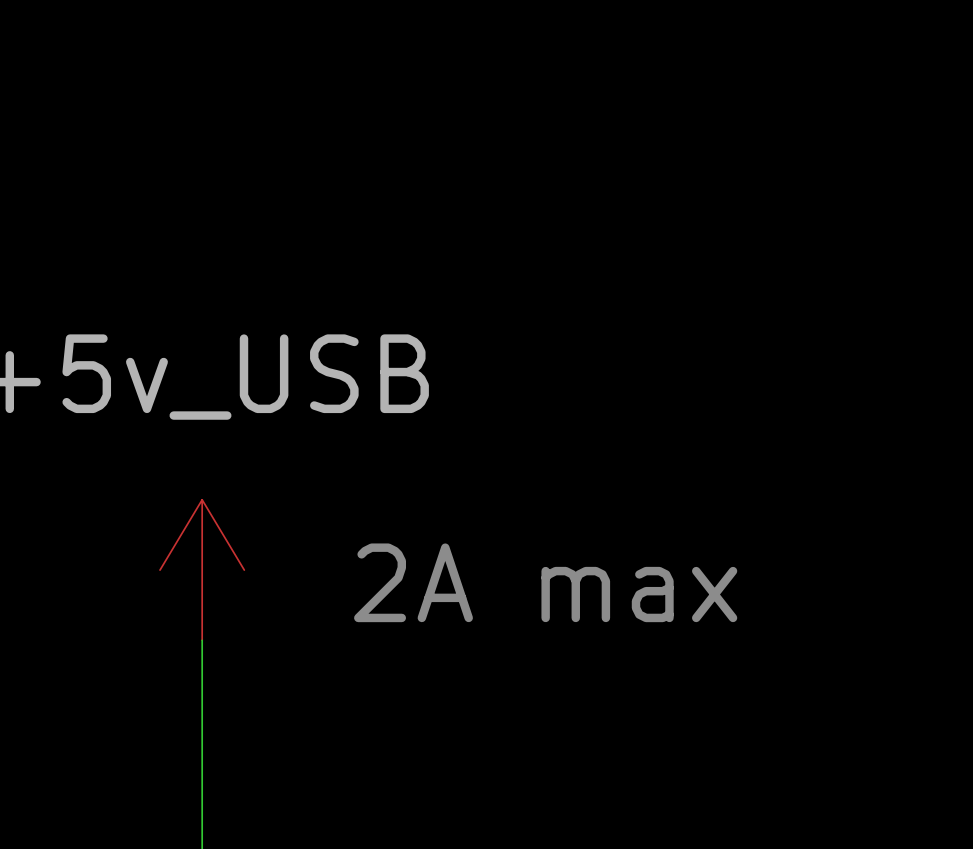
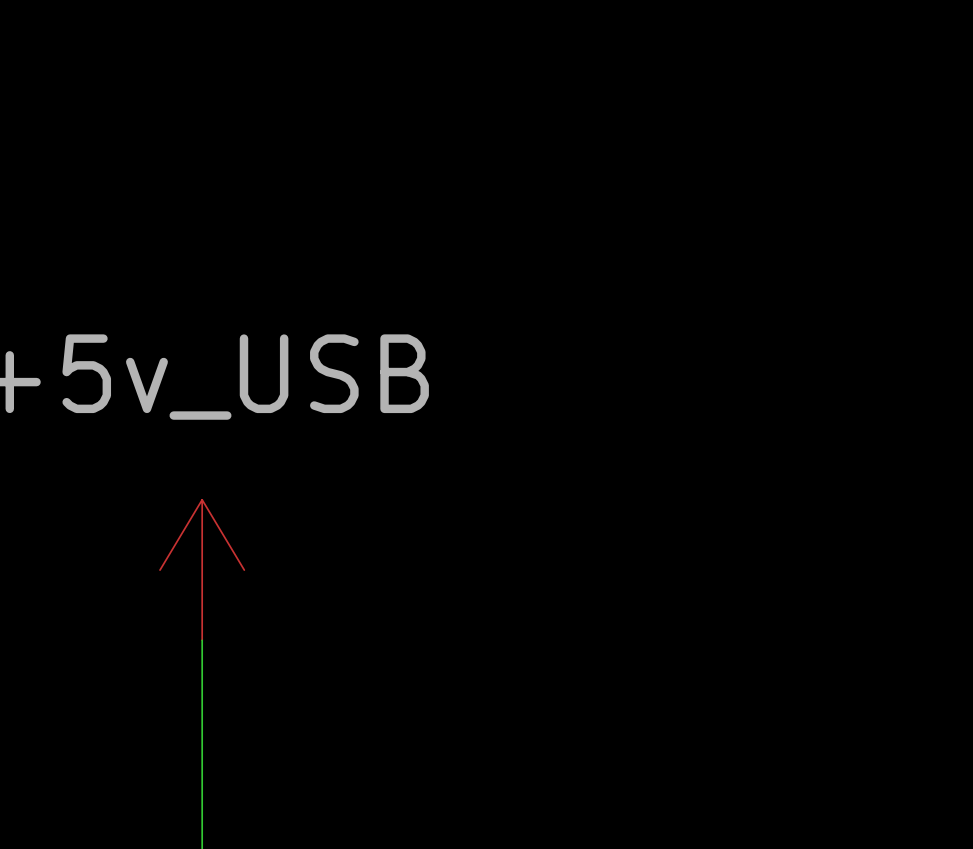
text: 2A max (545, 582) -> none

